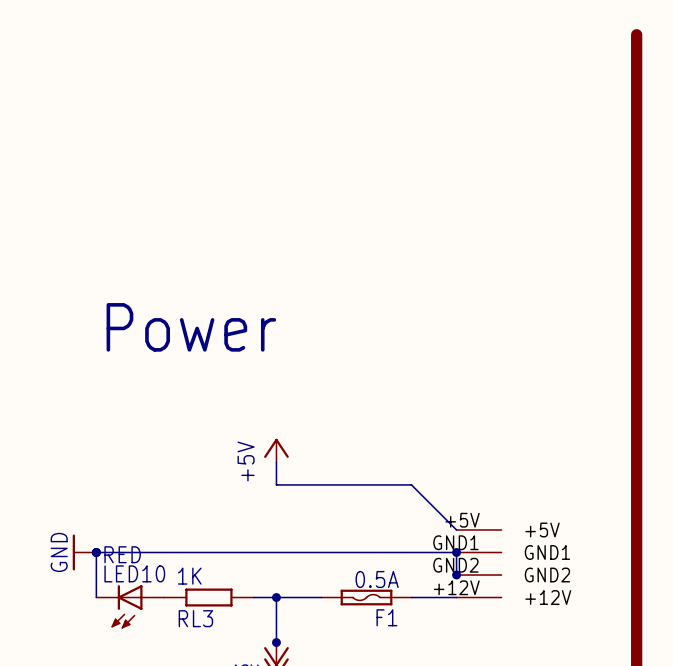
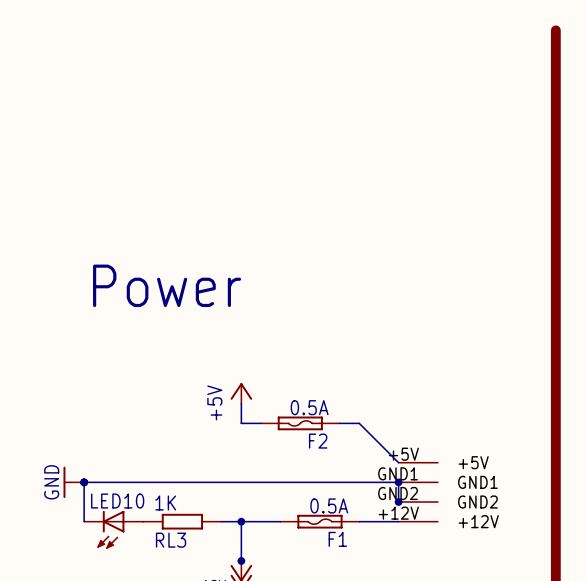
F2: none -> 0.5A (300, 423)
LED10 value: RED (122, 554) -> none

